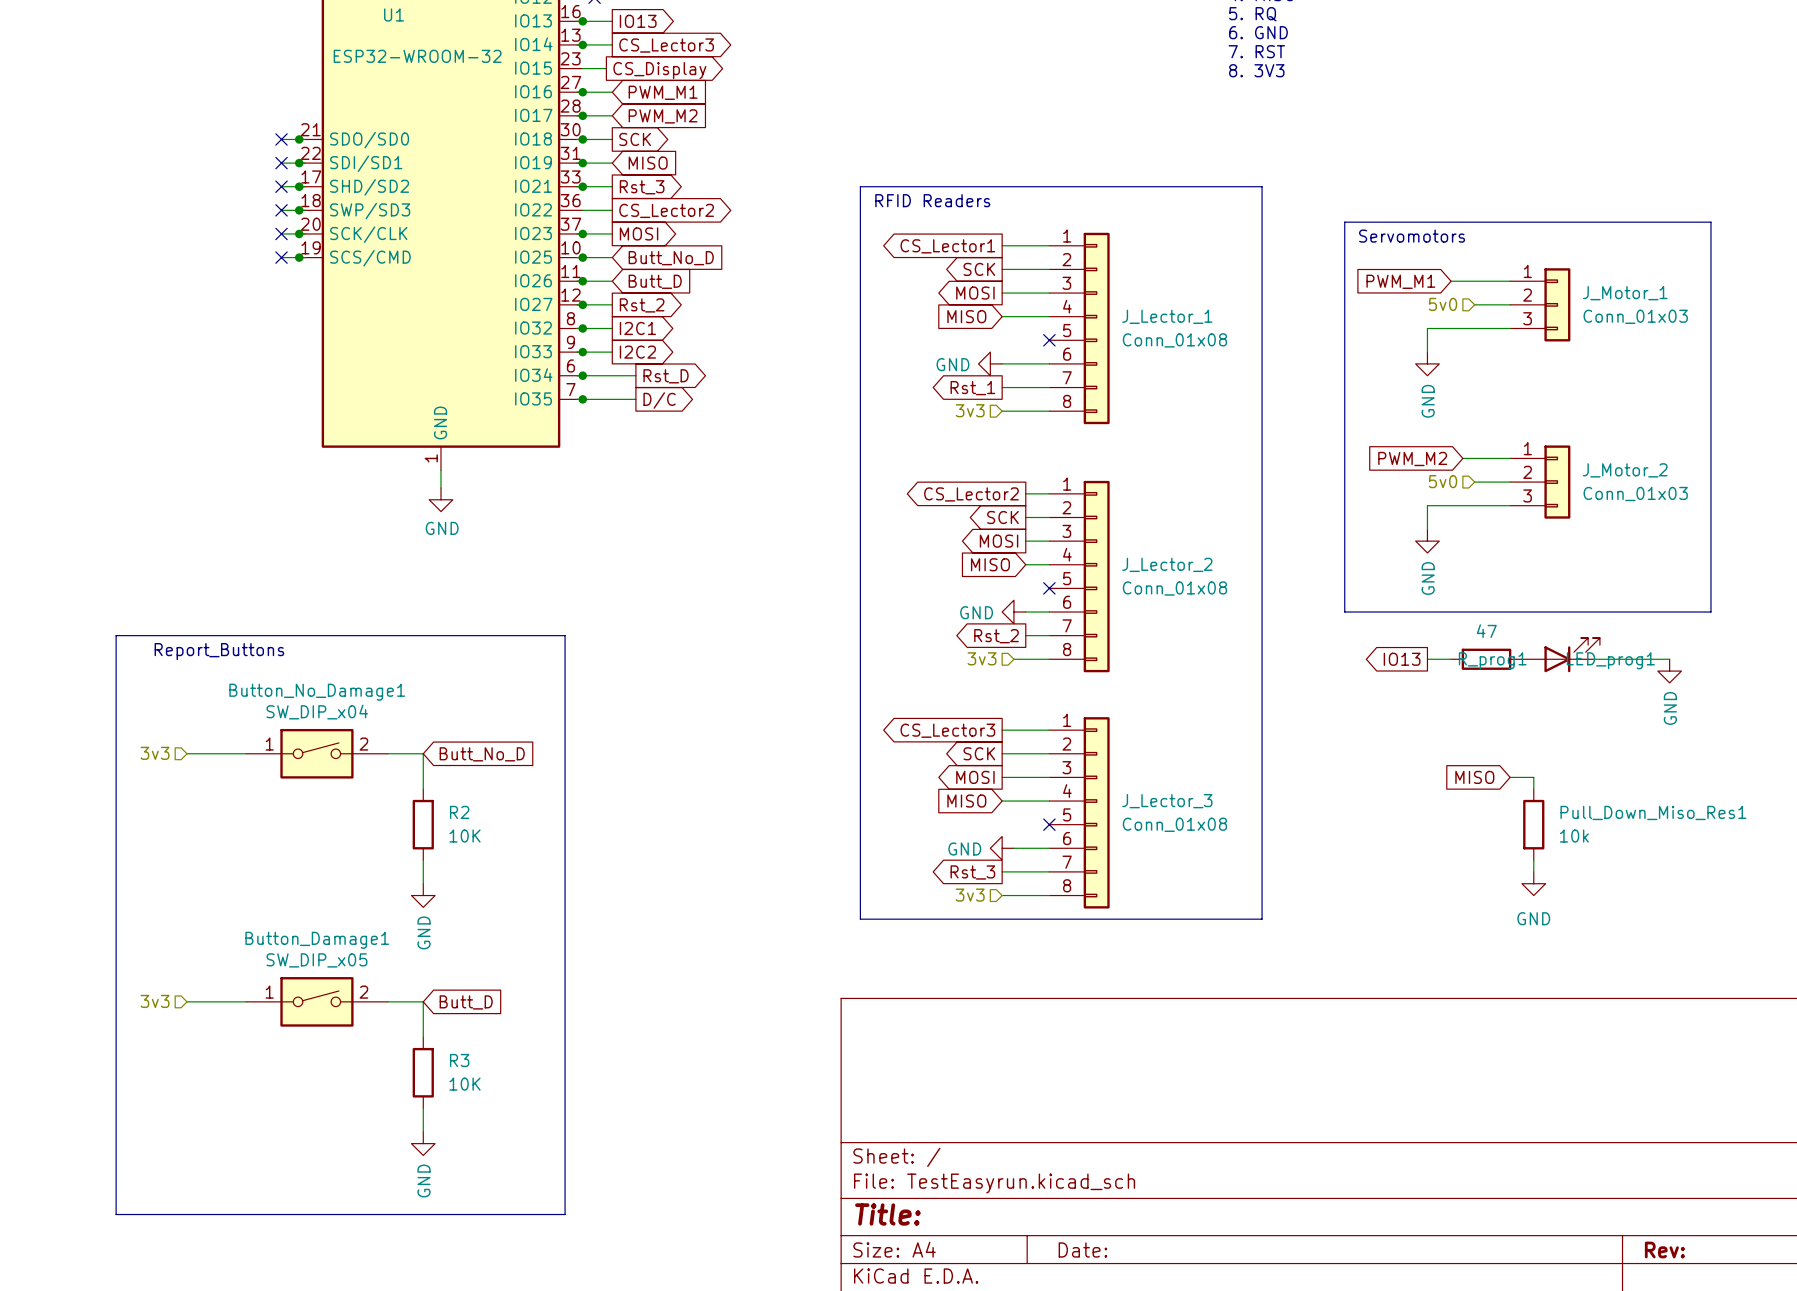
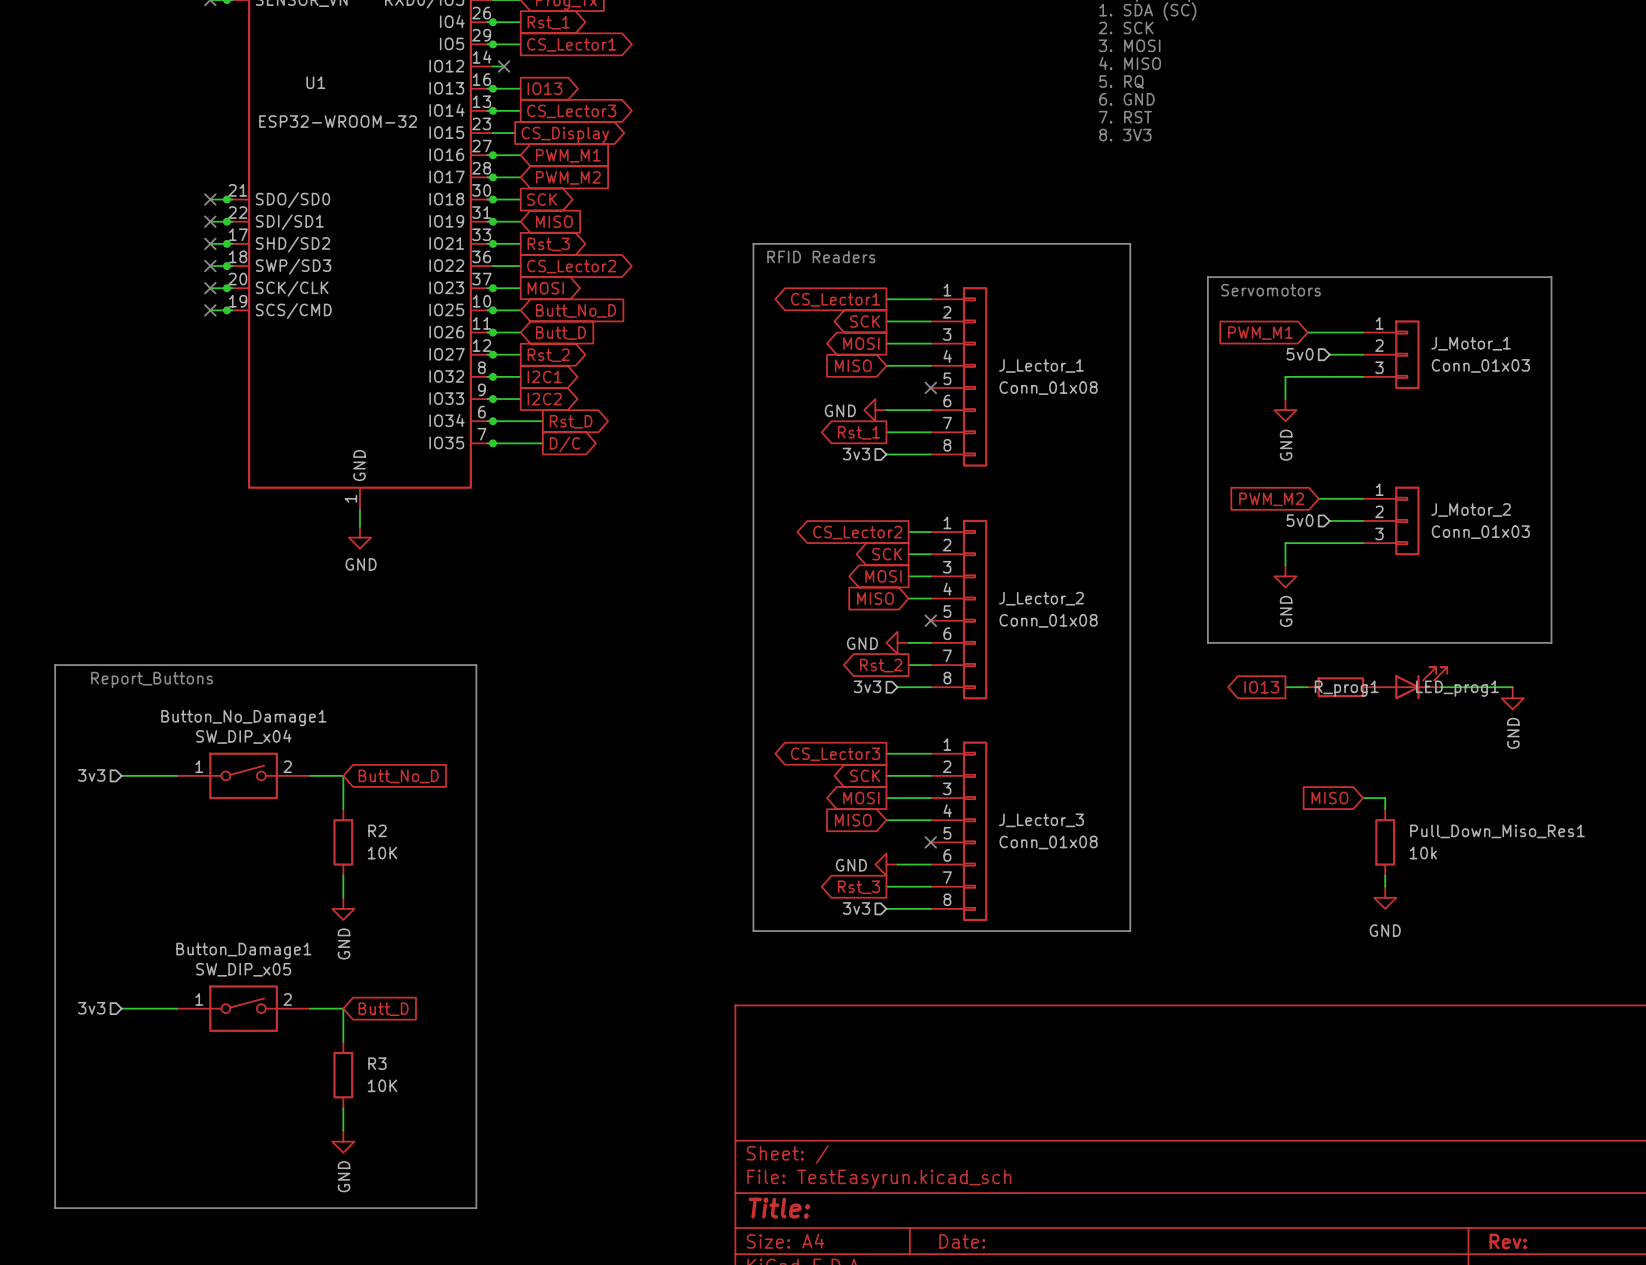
R_prog1 value: 47 (1486, 631) -> none

